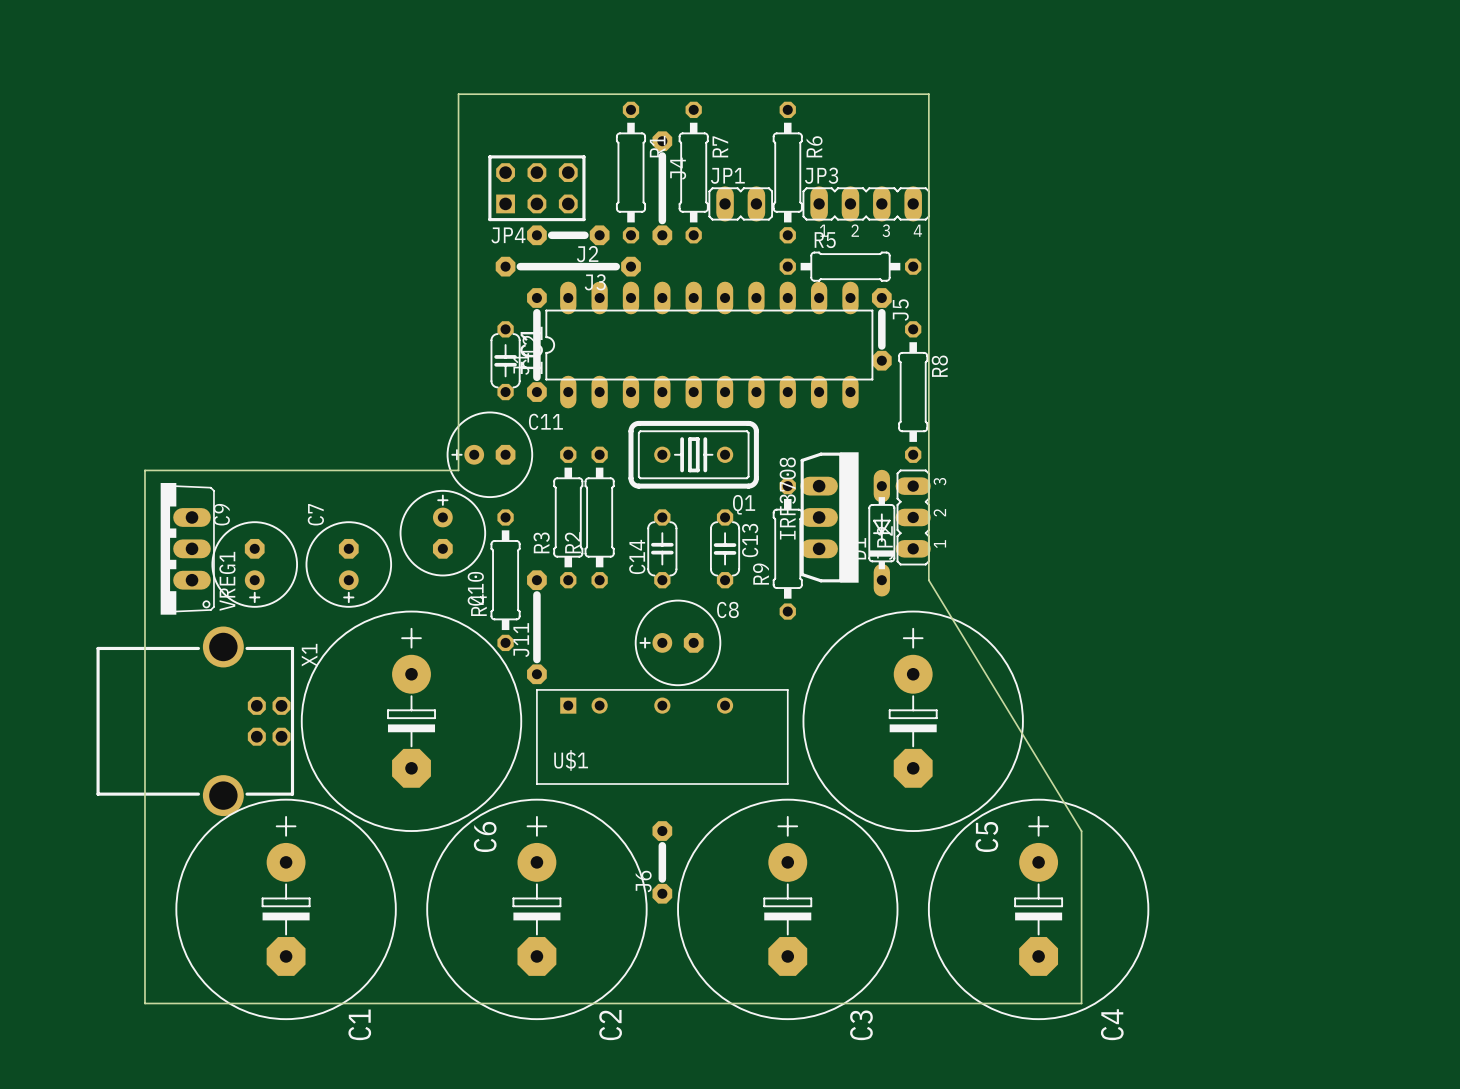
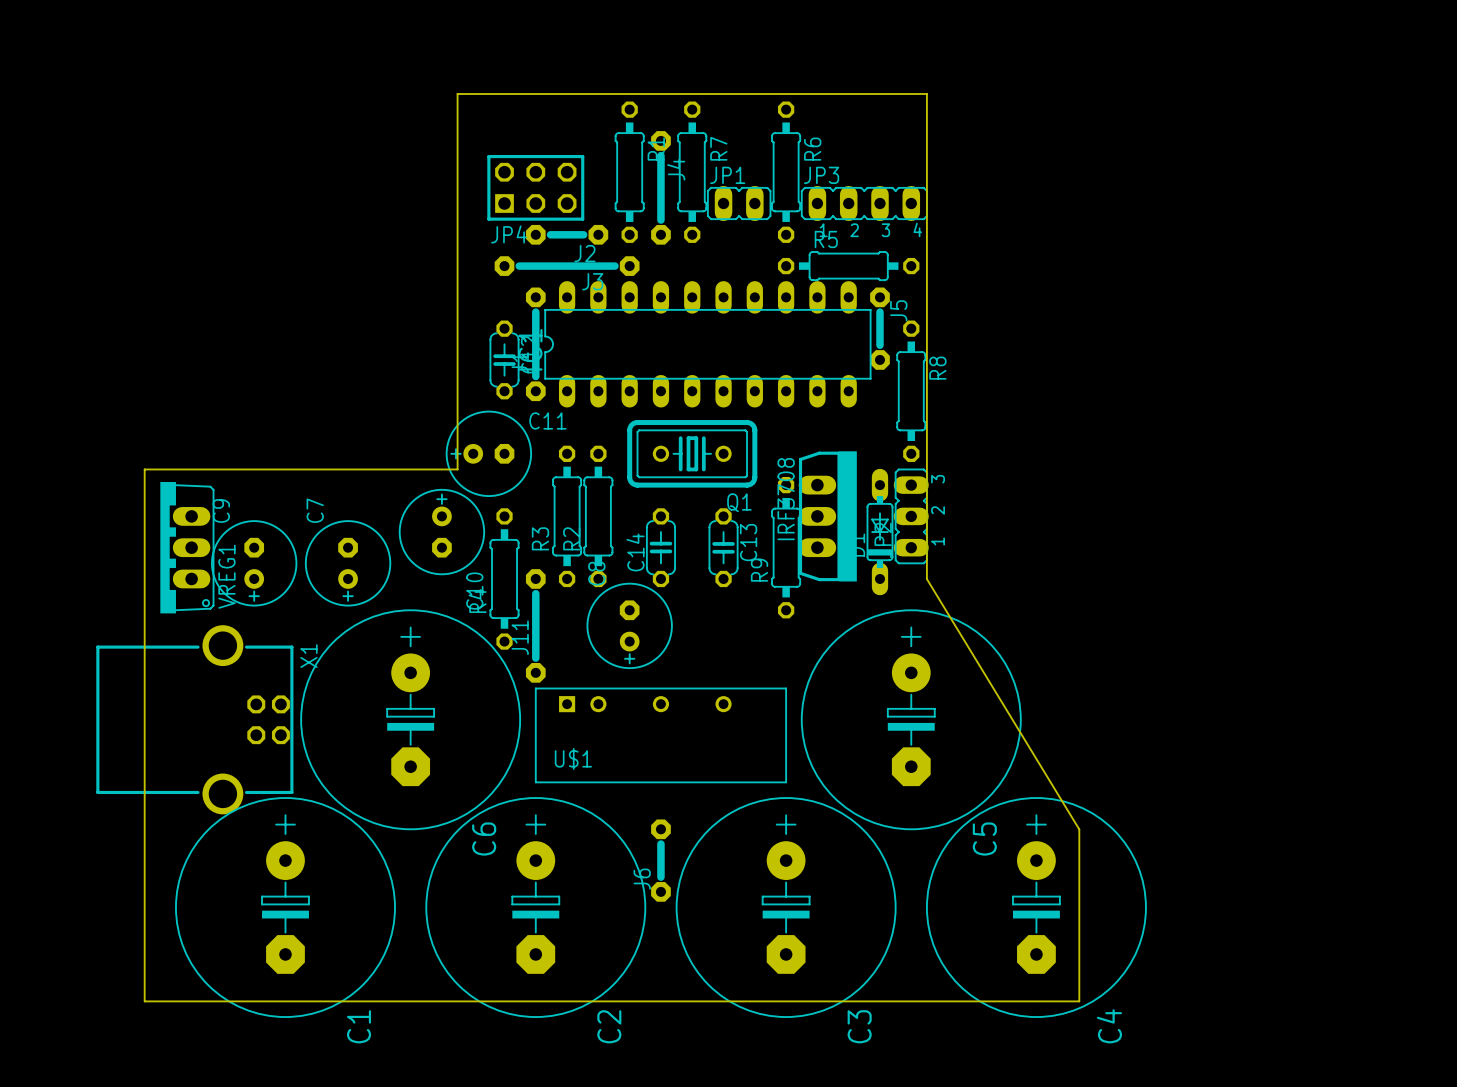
C8 rotation: 0° (678, 642) -> 90° counterclockwise (629, 625)

